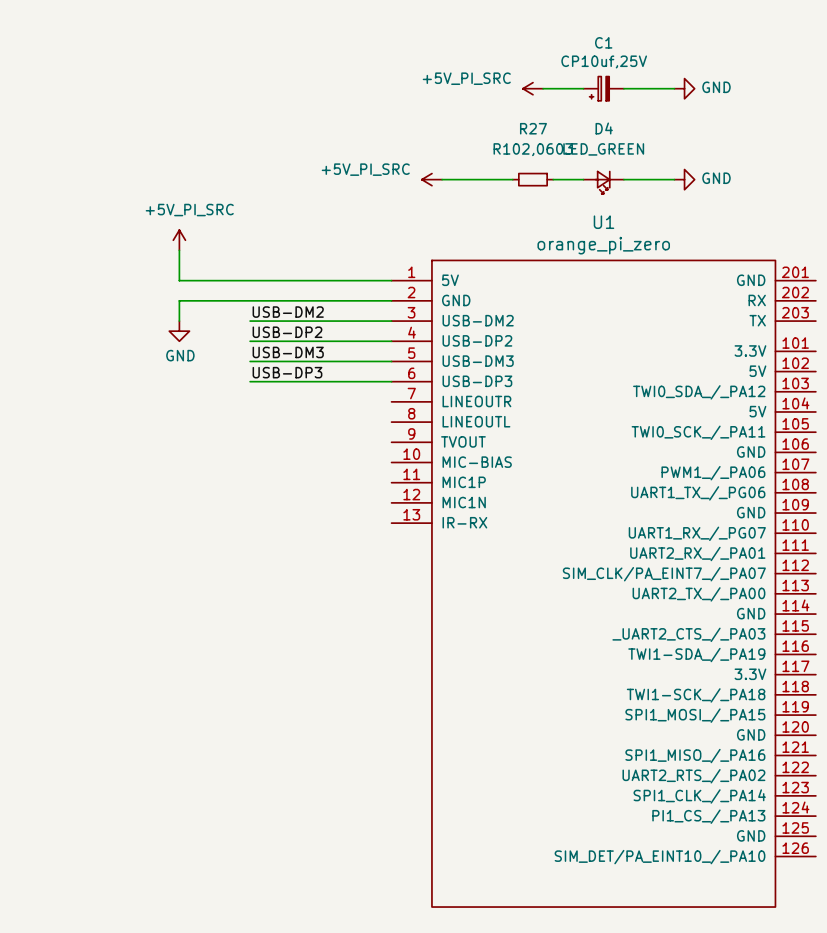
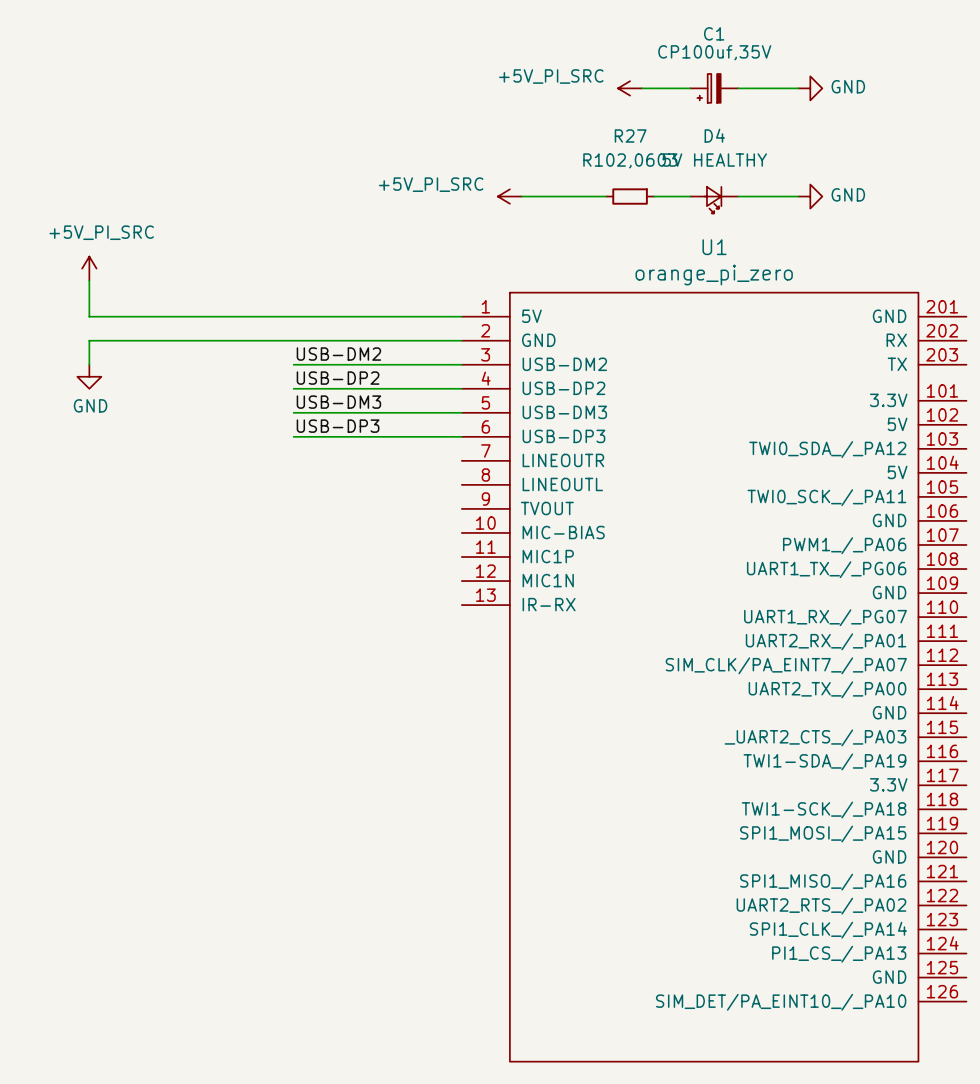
C1 value: CP10uf,25V (604, 61) -> CP100uf,35V (714, 52)
D4 value: LED_GREEN (603, 149) -> 5V HEALTHY (714, 160)
power symbol position: +5V_PI_SRC (179, 240) -> +5V_PI_SRC (89, 268)
wire: (179, 250) (179, 280) -> (89, 280) (89, 316) (209, 316)
wire: (179, 300) (179, 321) -> (209, 340) (89, 340) (89, 364)
power symbol position: GND (179, 331) -> GND (89, 376)

